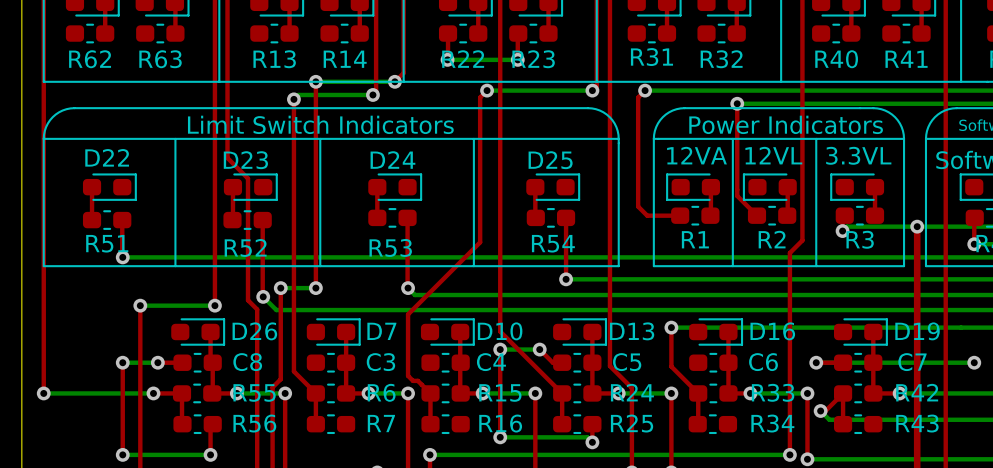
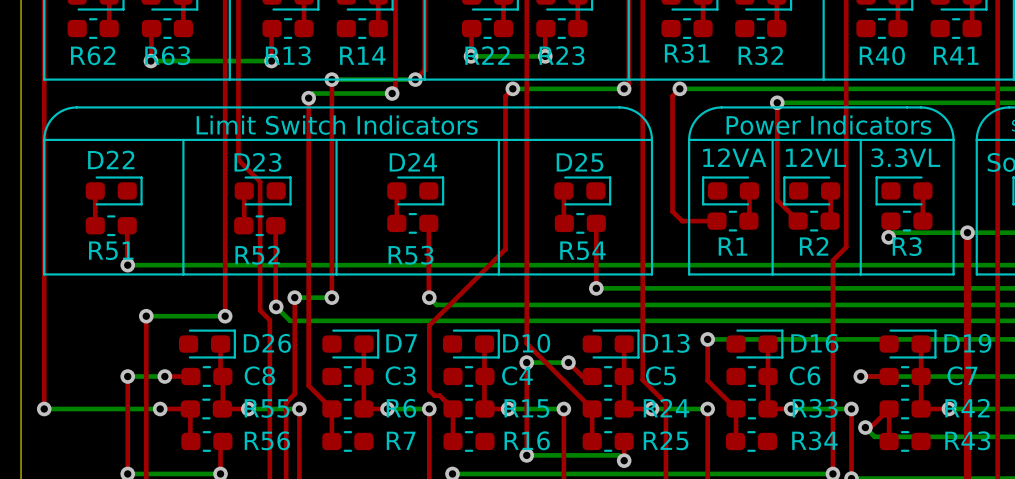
top track: none -> (151, 28) (150, 61)
top track: none -> (271, 29) (271, 61)
bottom track: none -> (150, 61) (271, 61)
via: none -> (150, 61)
via: none -> (271, 61)

